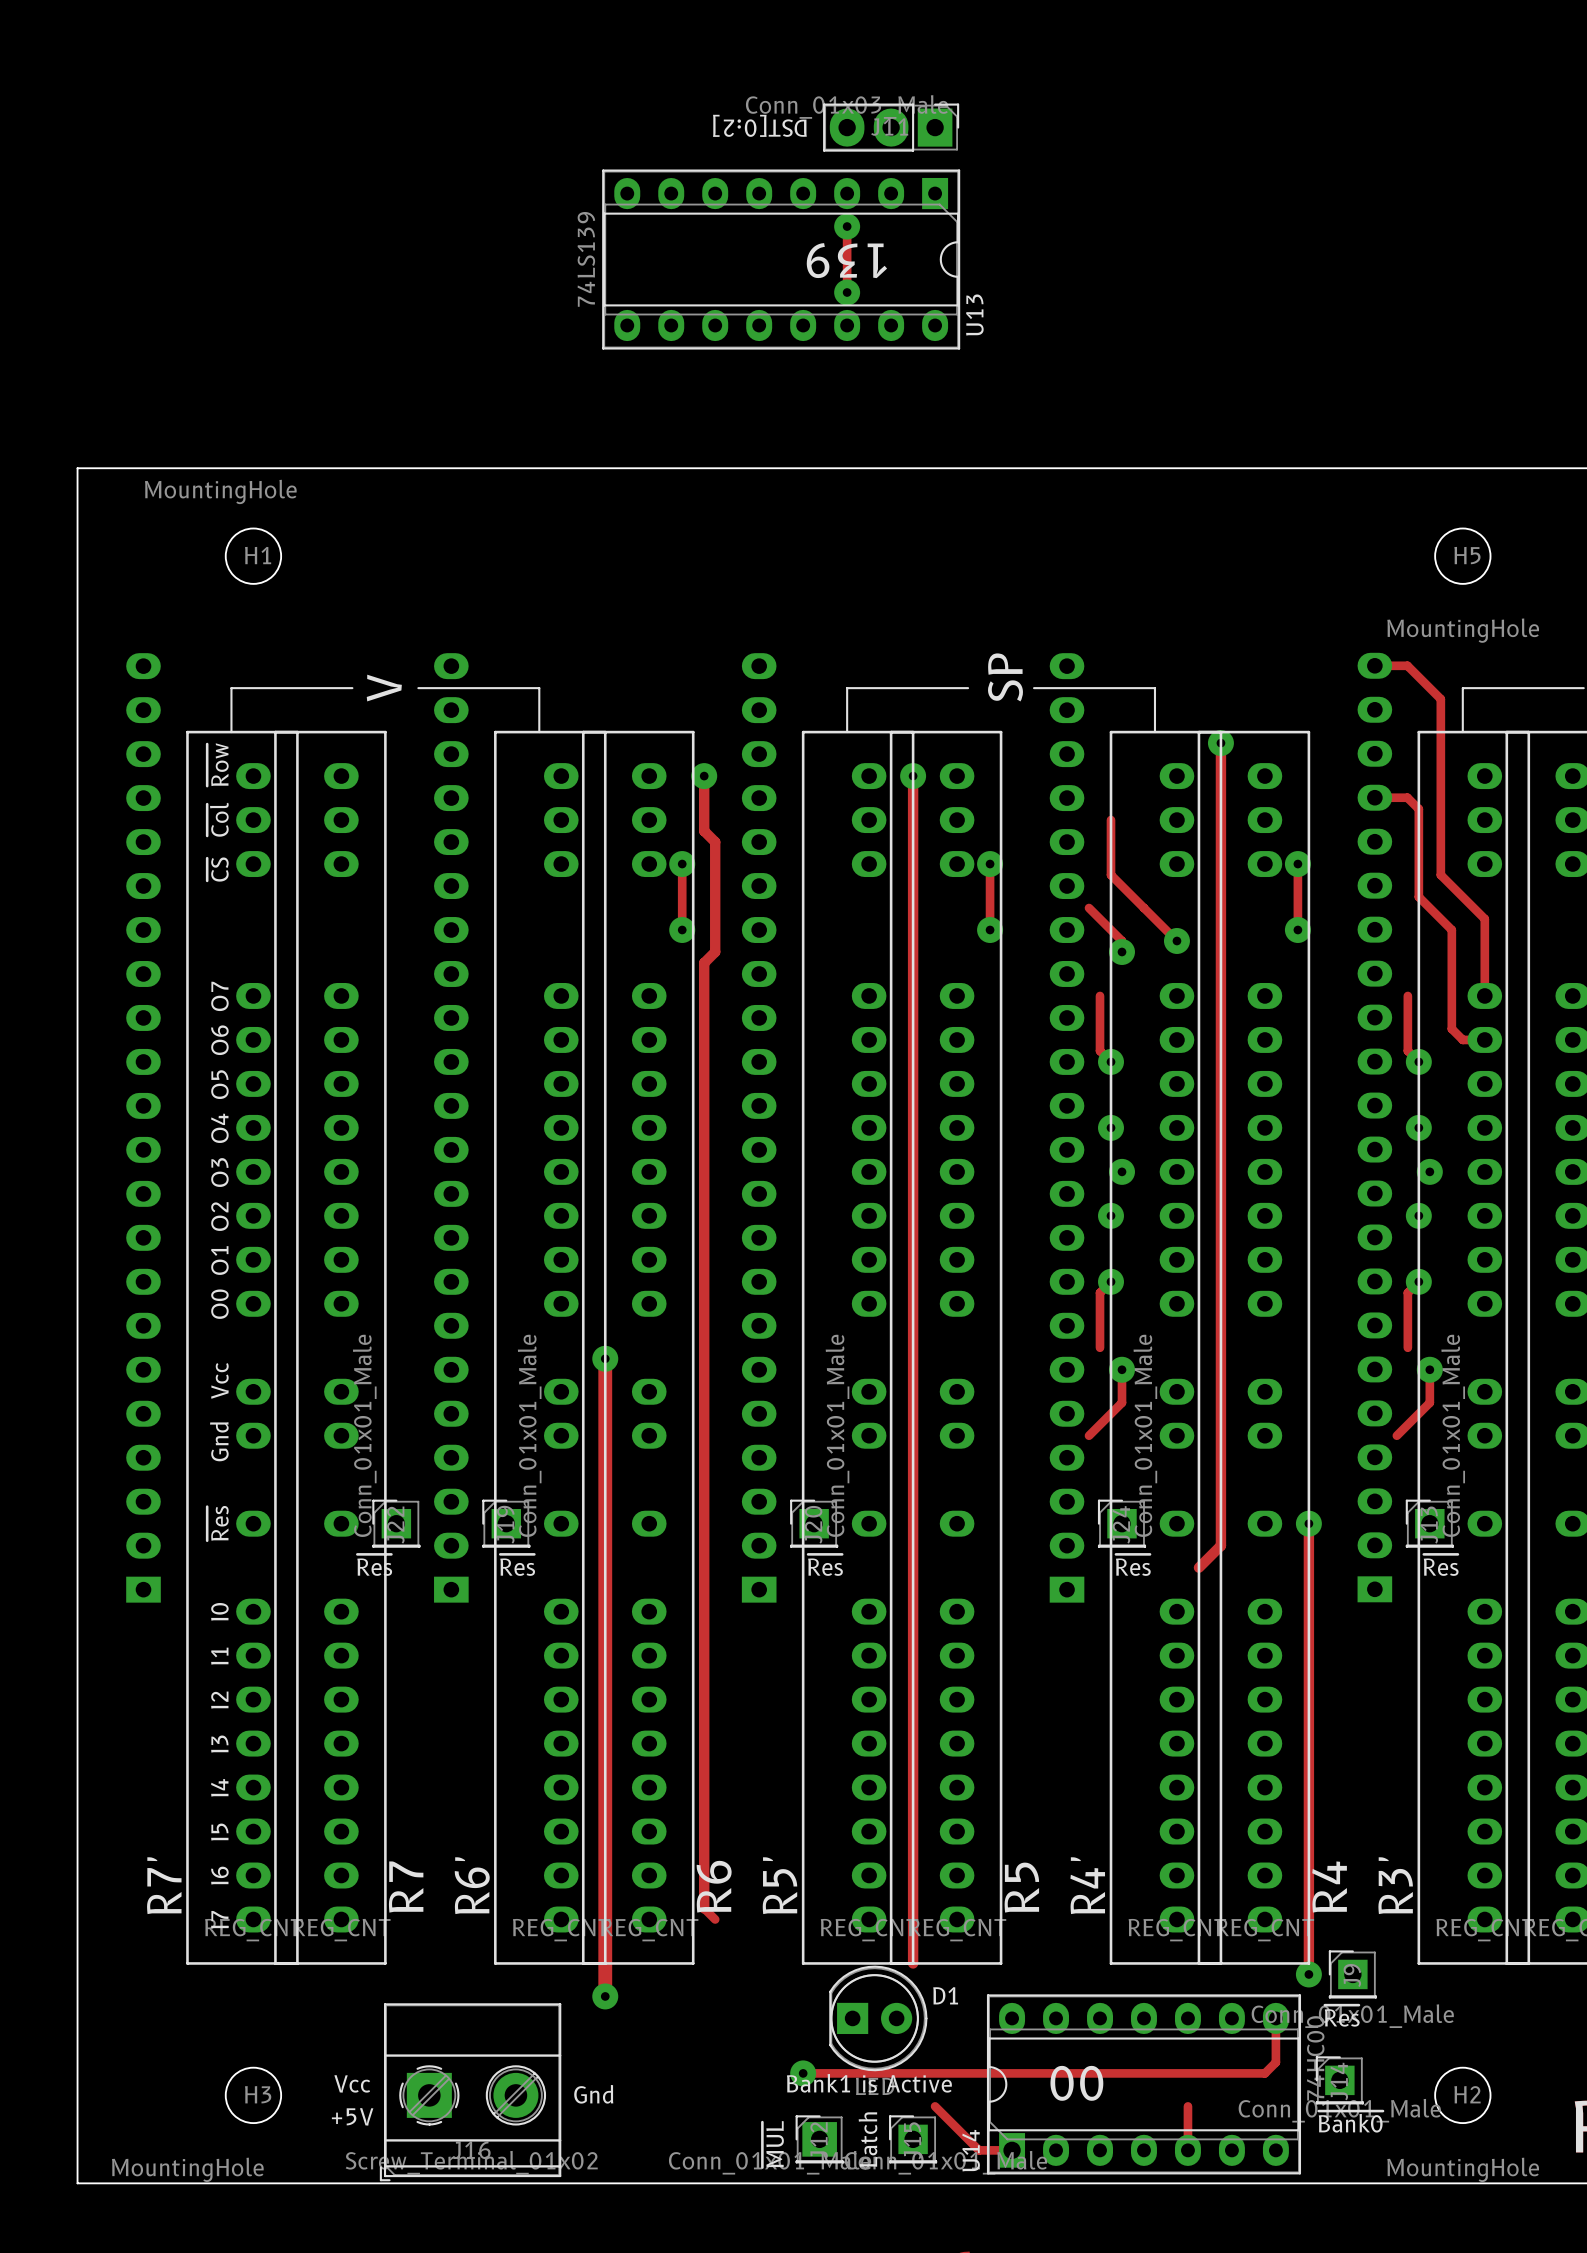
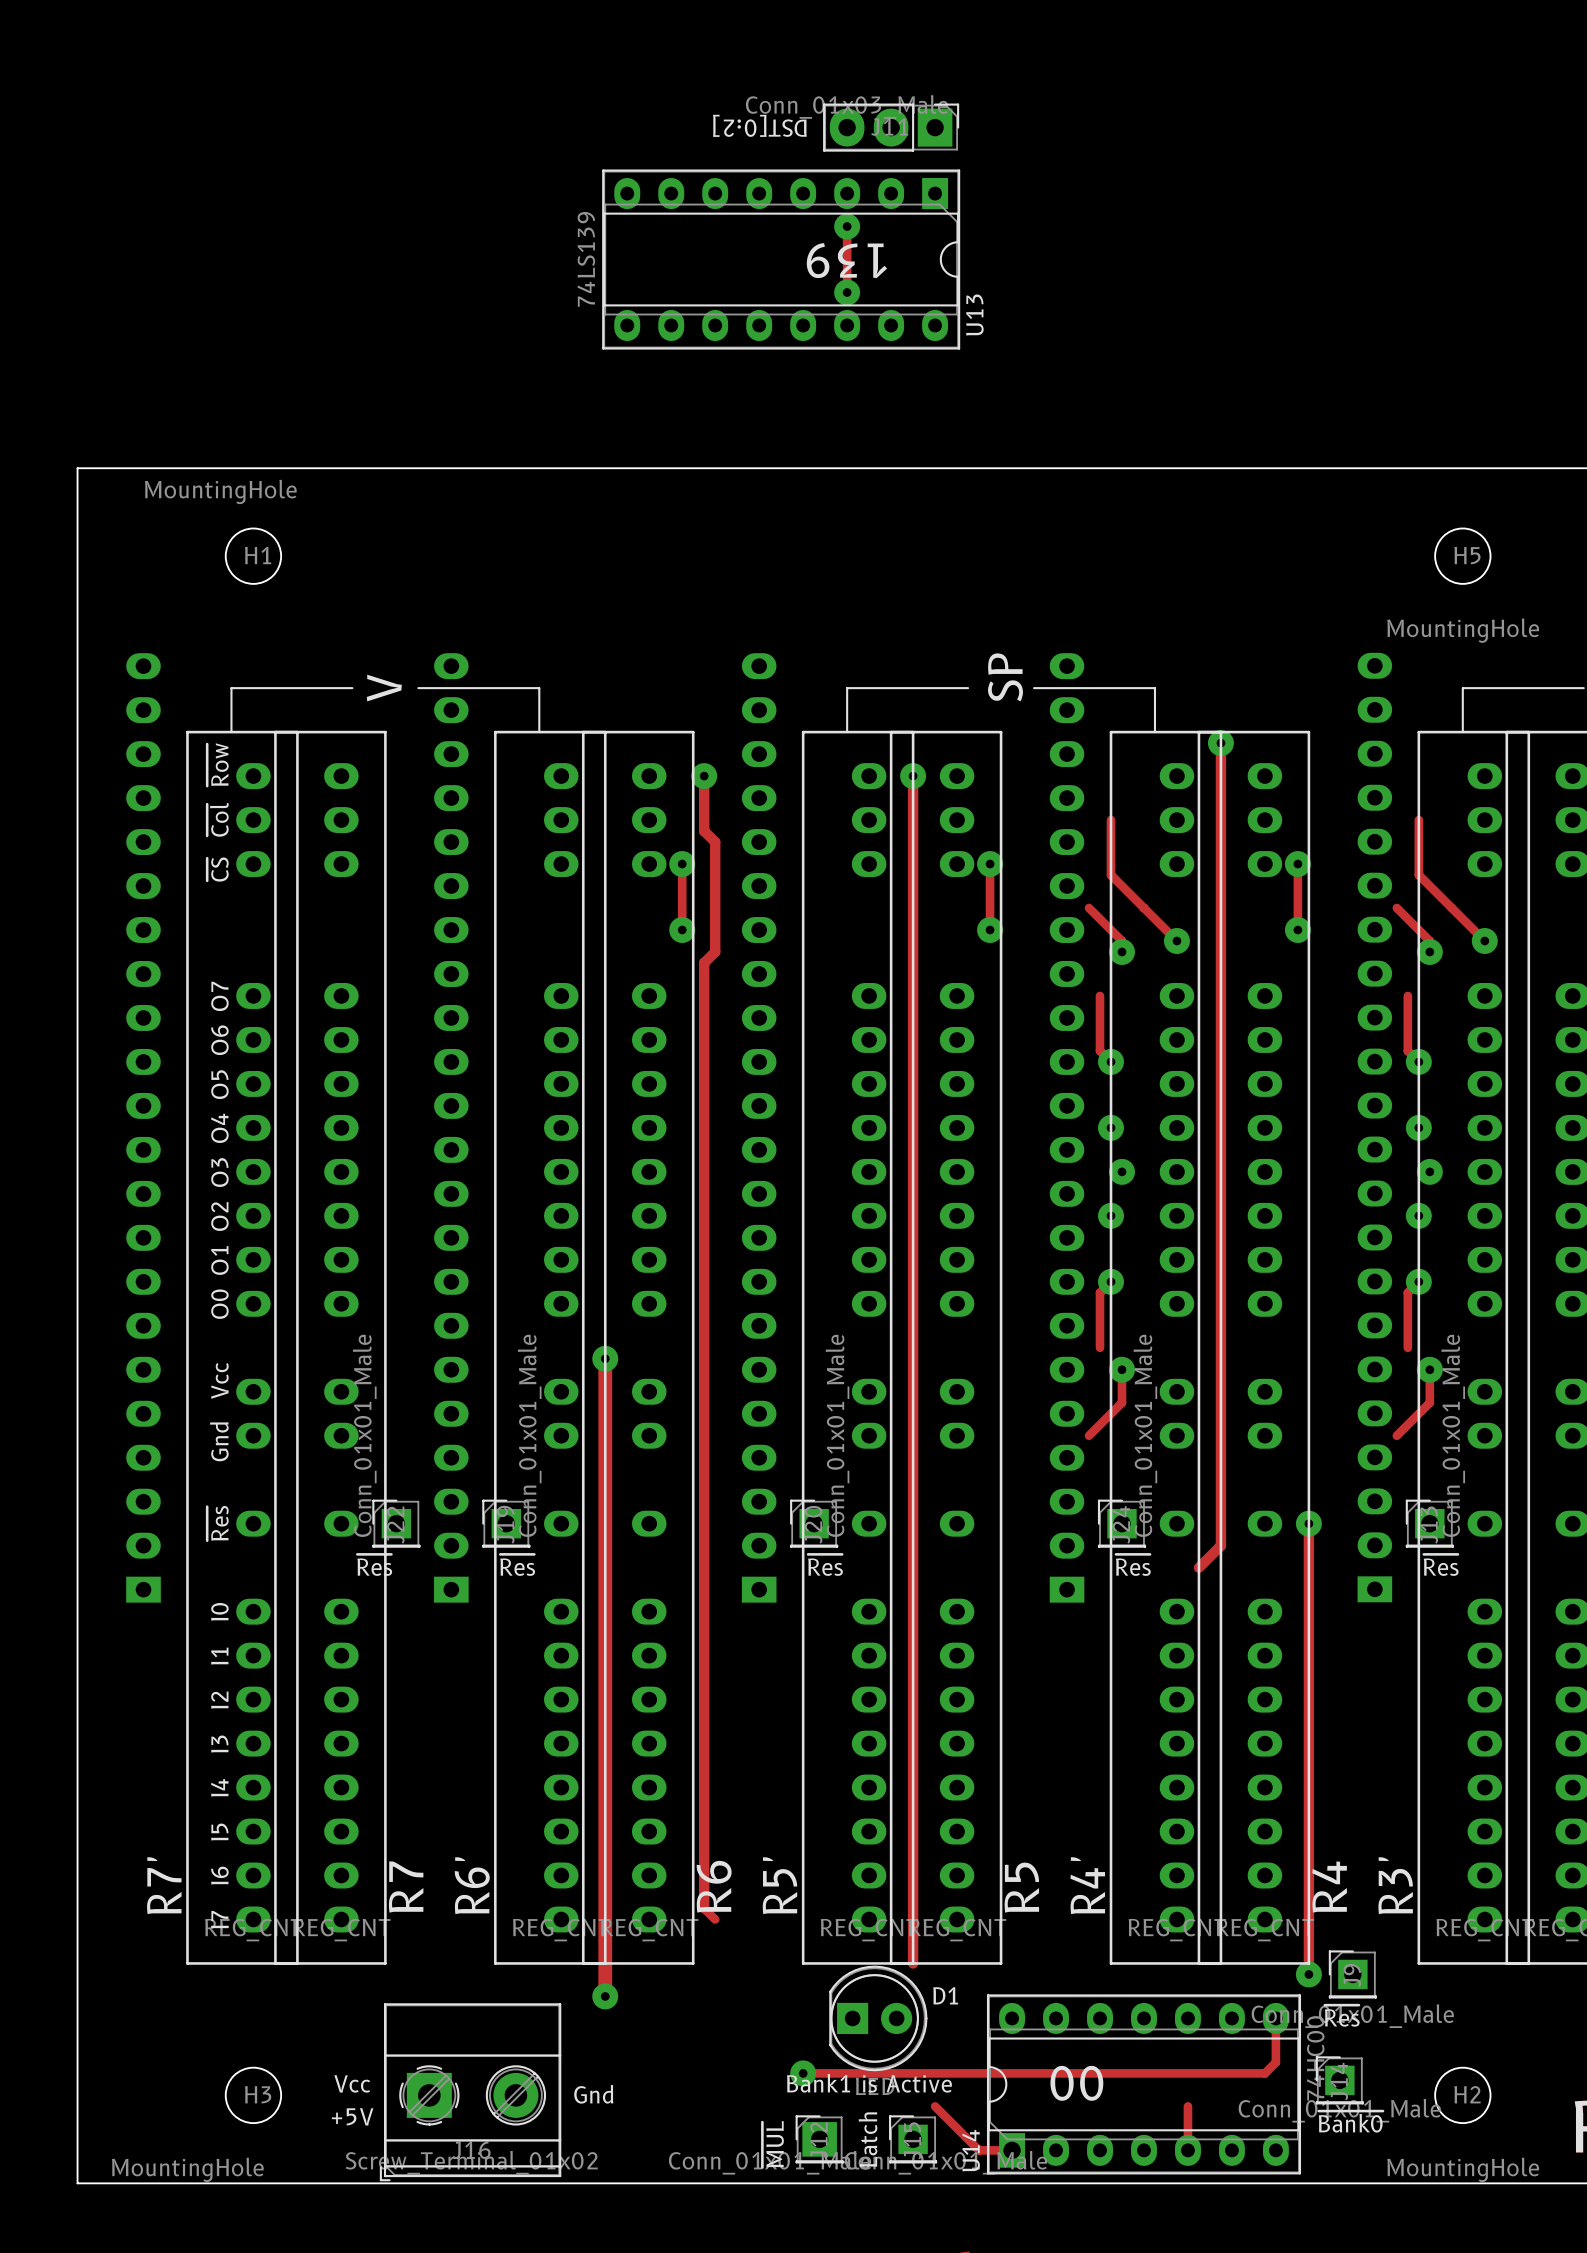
track: (1374, 665) (1407, 665) (1440, 699) (1440, 875) (1484, 919) (1484, 995) -> none
track: (1374, 797) (1407, 797) (1418, 809) (1418, 820) -> none
track: (1418, 875) (1418, 897) (1451, 930) (1451, 1028) (1462, 1039) (1484, 1039) -> (1418, 875) (1484, 940)
track: none -> (1396, 908) (1429, 940) (1429, 951)
via: none -> (1484, 940)
via: none -> (1429, 951)

